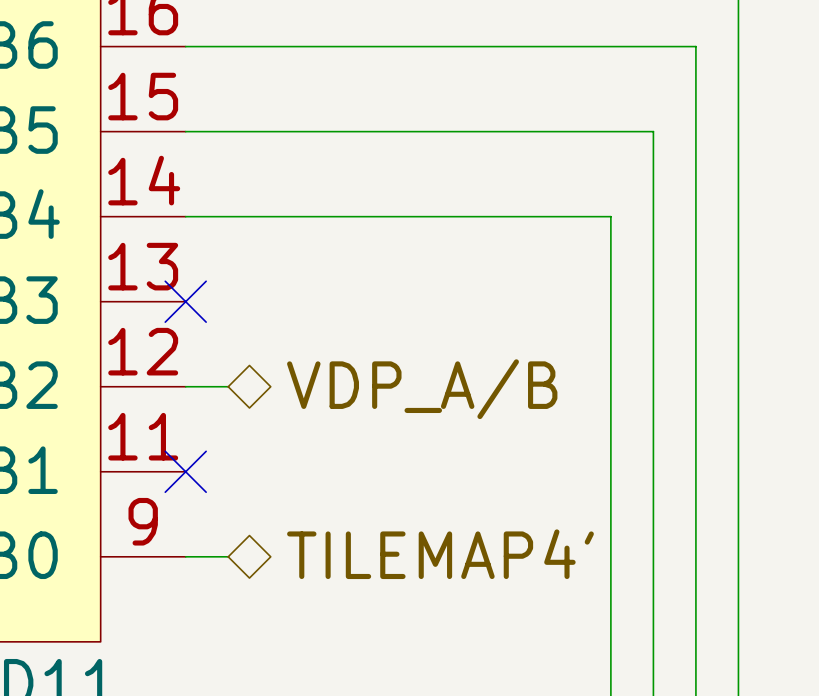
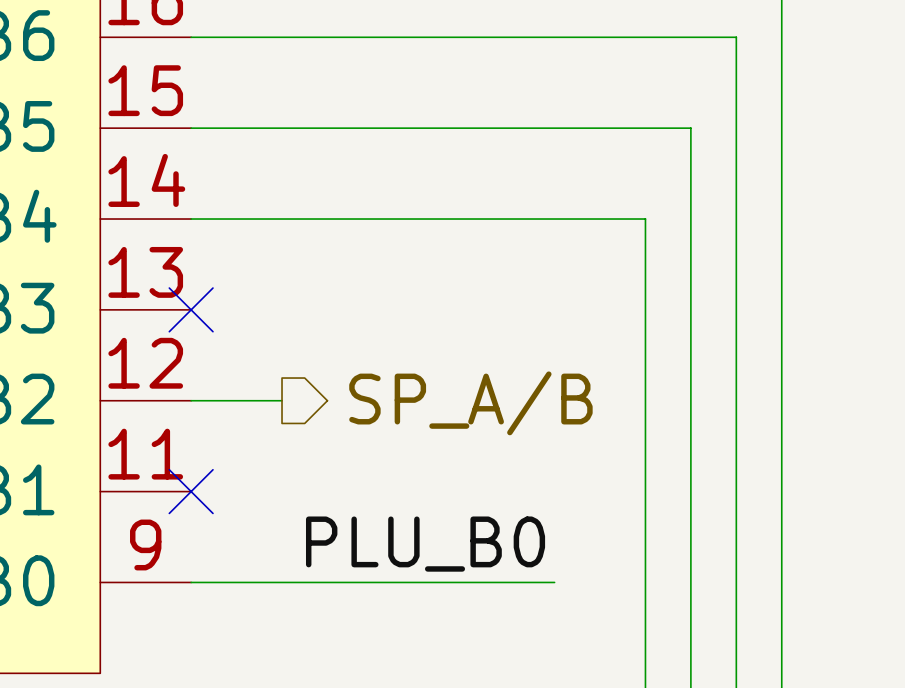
wire: none -> (236, 400) (282, 400)
hierarchical label shape: bidirectional (422, 389) -> output (470, 403)
hierarchical label: VDP_A/B (422, 389) -> SP_A/B (470, 403)
label: none -> PLU_B0 (425, 544)
hierarchical label: TILEMAP4' (440, 554) -> none
wire: none -> (236, 582) (554, 582)

